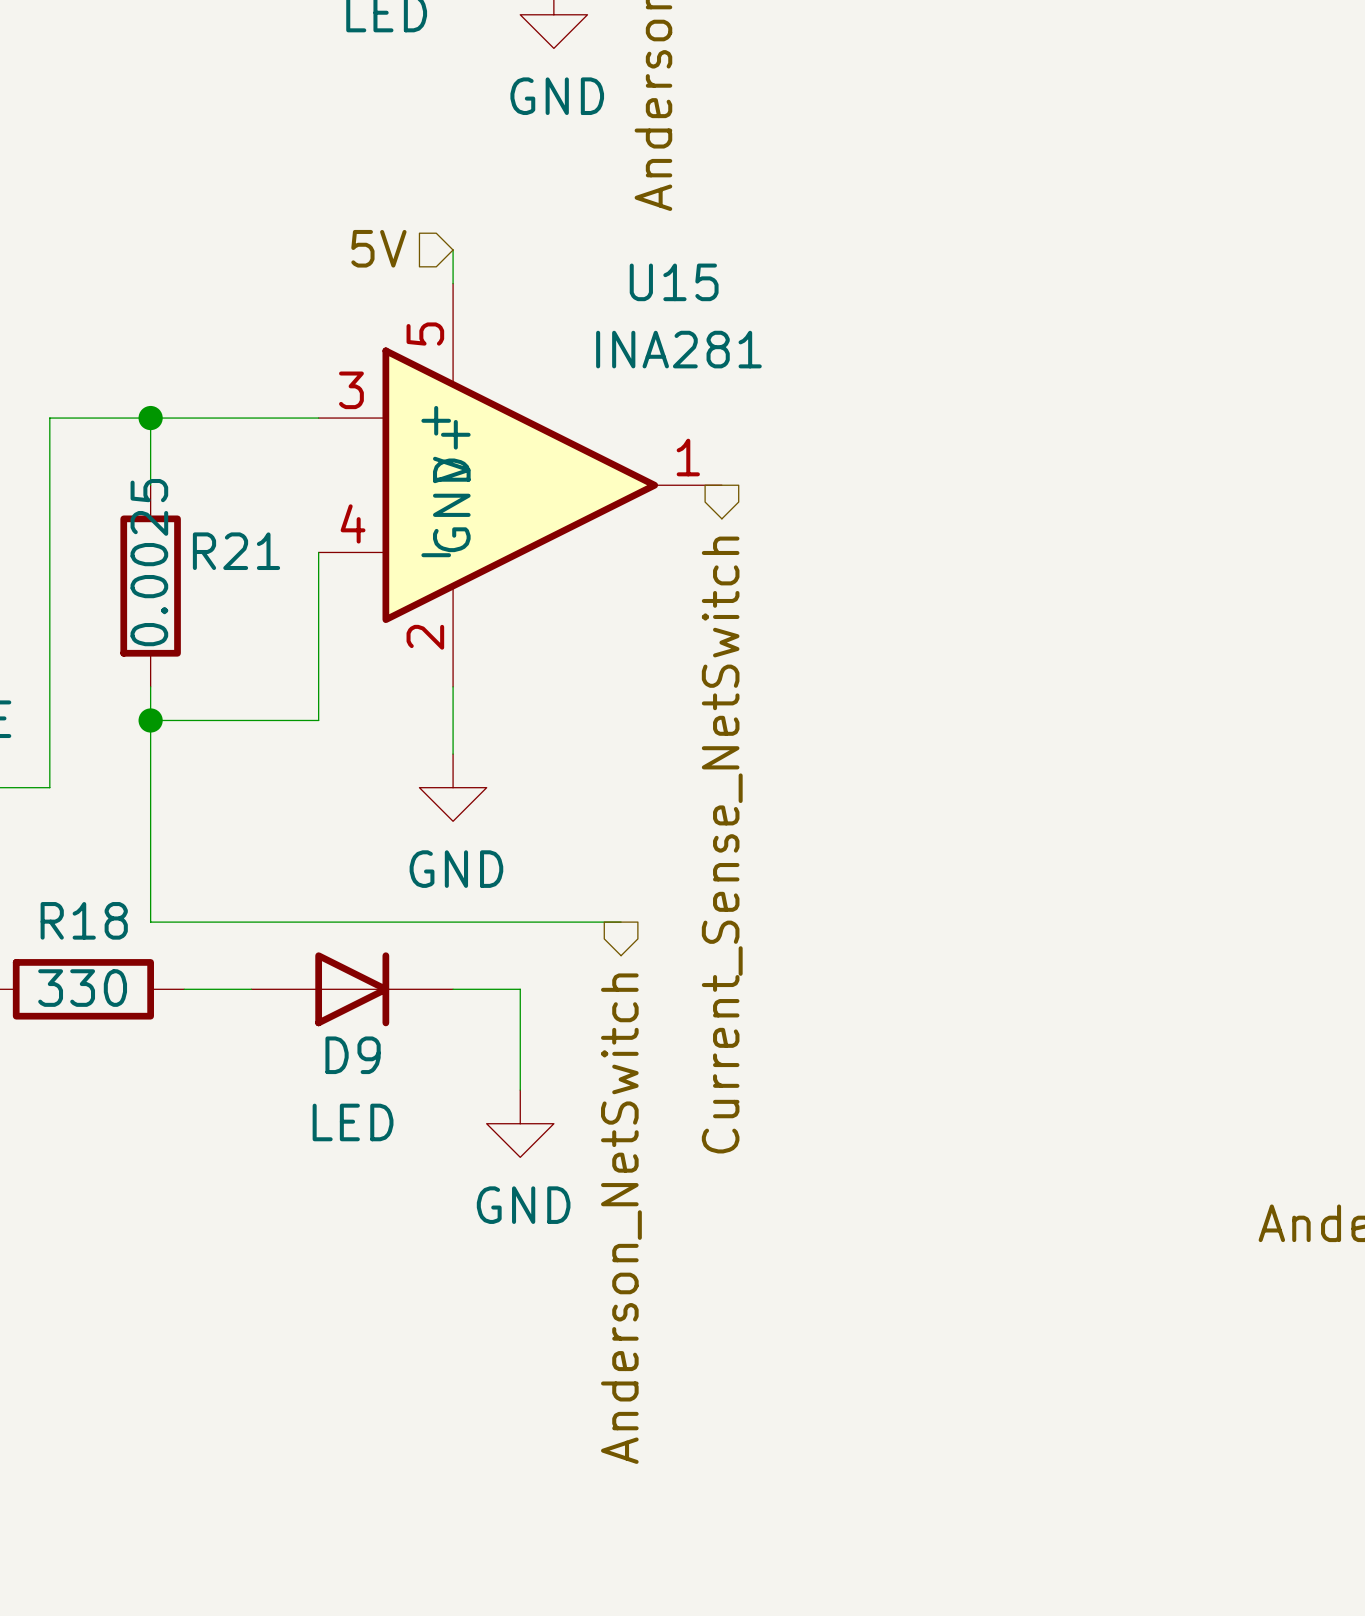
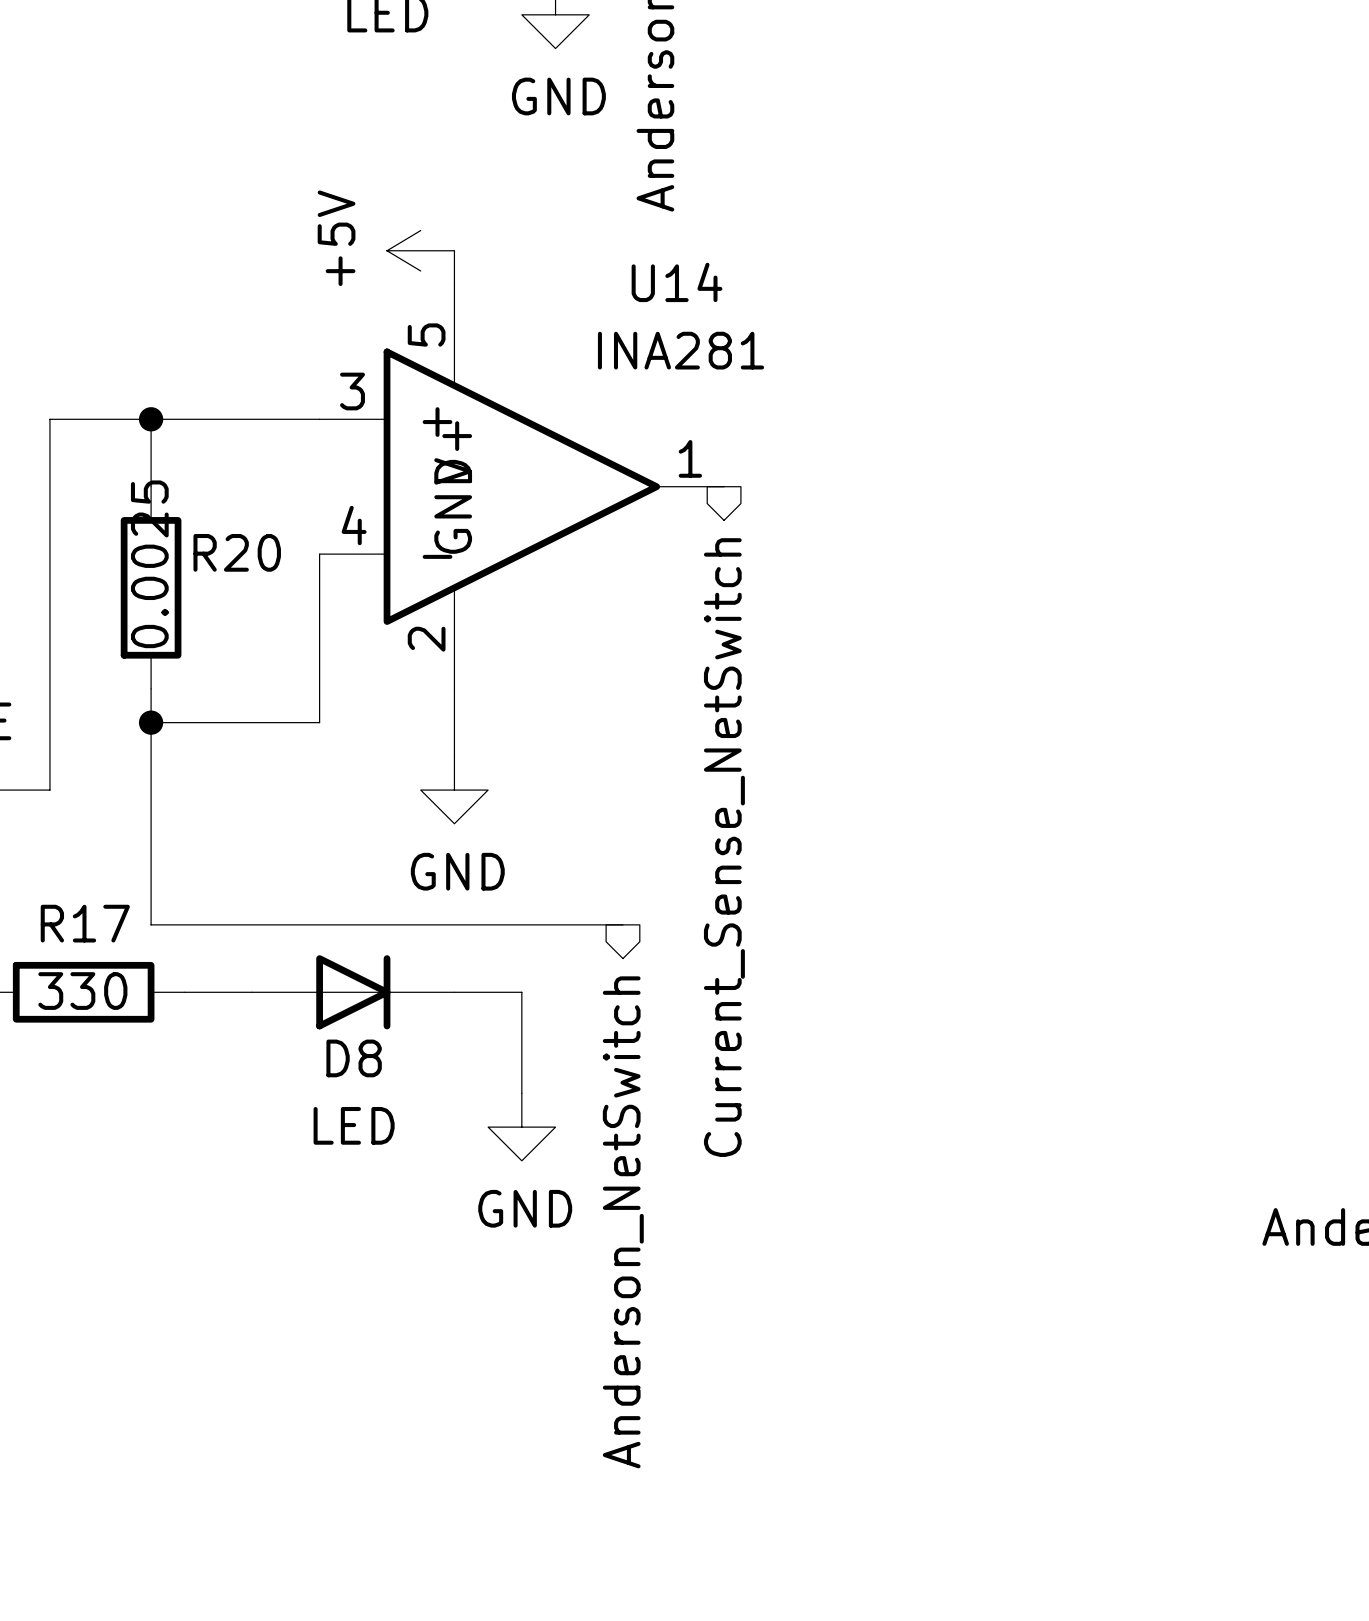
hierarchical label: 5V (378, 248) -> none
power symbol: none -> +5V (420, 250)
U15 name: U15 (674, 282) -> U14 (676, 282)
R21 name: R21 (236, 551) -> R20 (237, 552)
R18 name: R18 (84, 920) -> R17 (85, 923)
D9 name: D9 (353, 1055) -> D8 (354, 1058)

